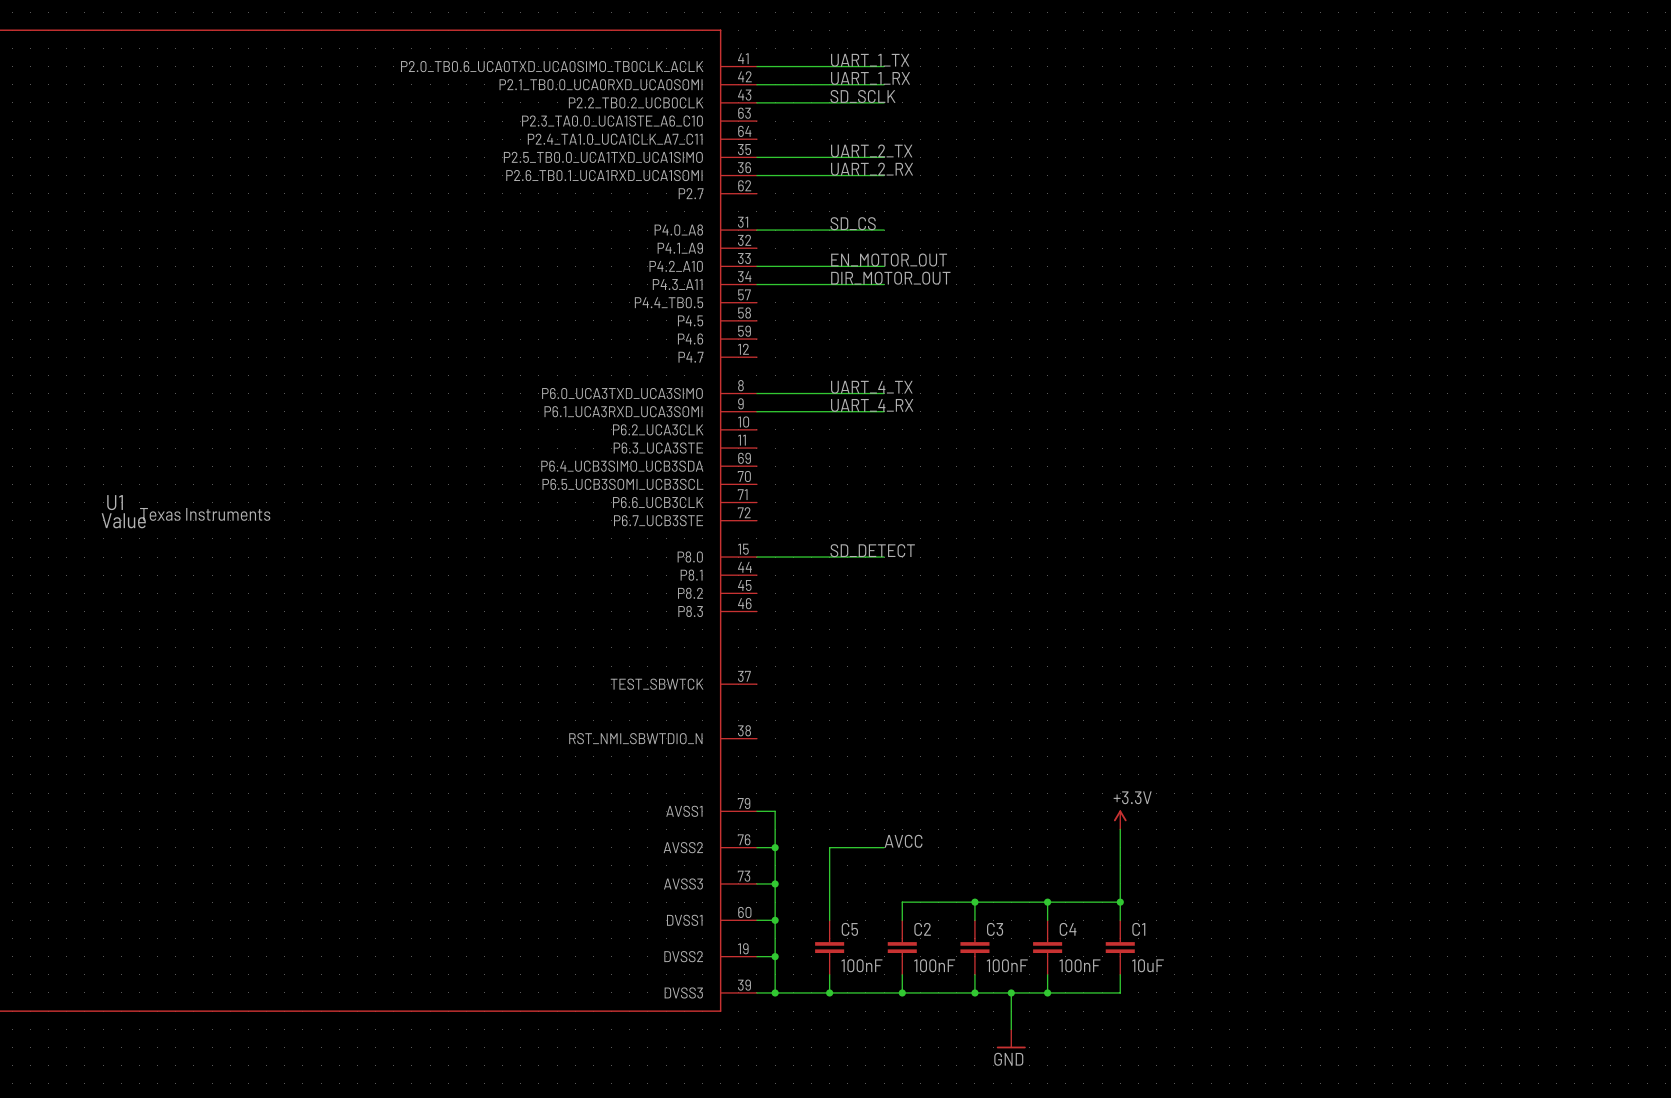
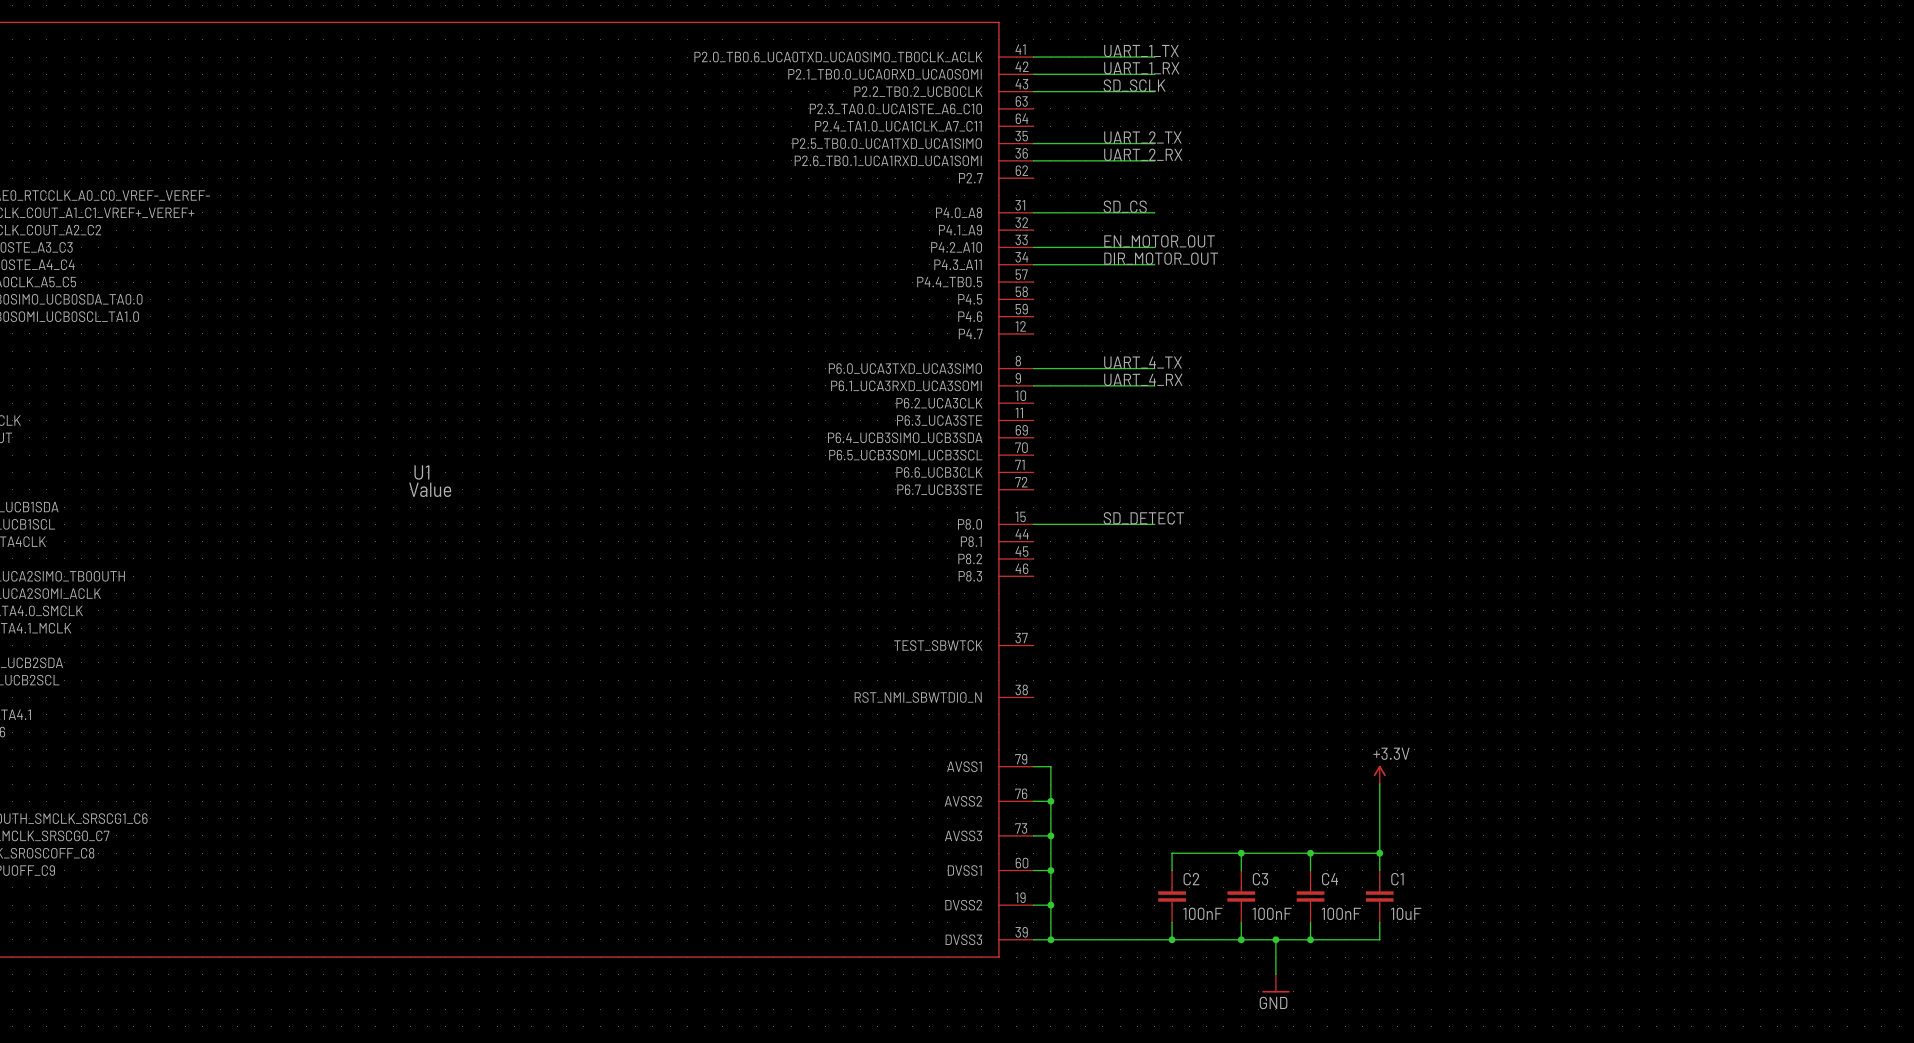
U1 text: Texas Instruments (205, 514) -> none
label: AVCC (903, 841) -> none
wire: (884, 847) (829, 847) (829, 920) -> none
C5: 100nF (829, 947) -> none
wire: (829, 974) (829, 992) -> none
junction: (829, 992) -> none

